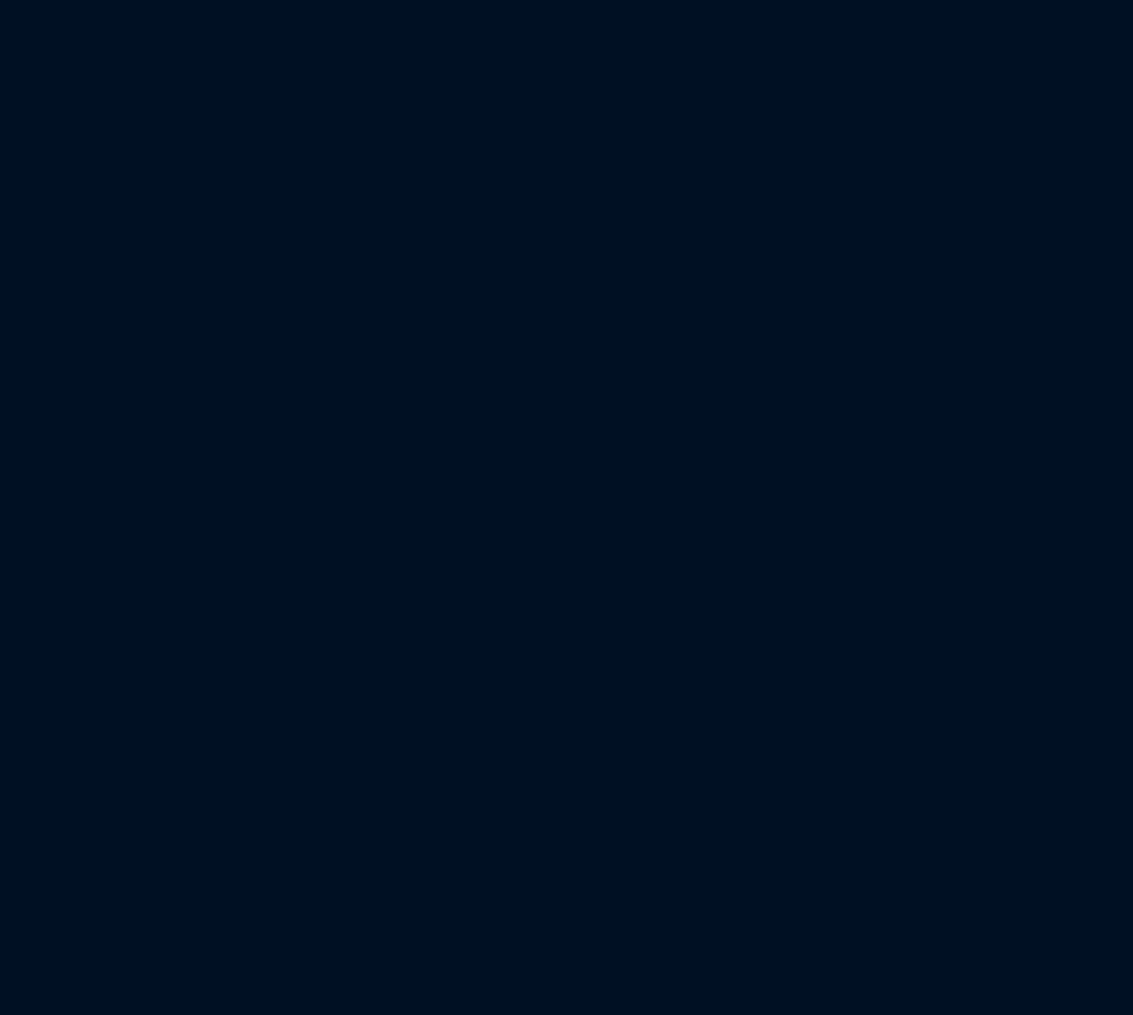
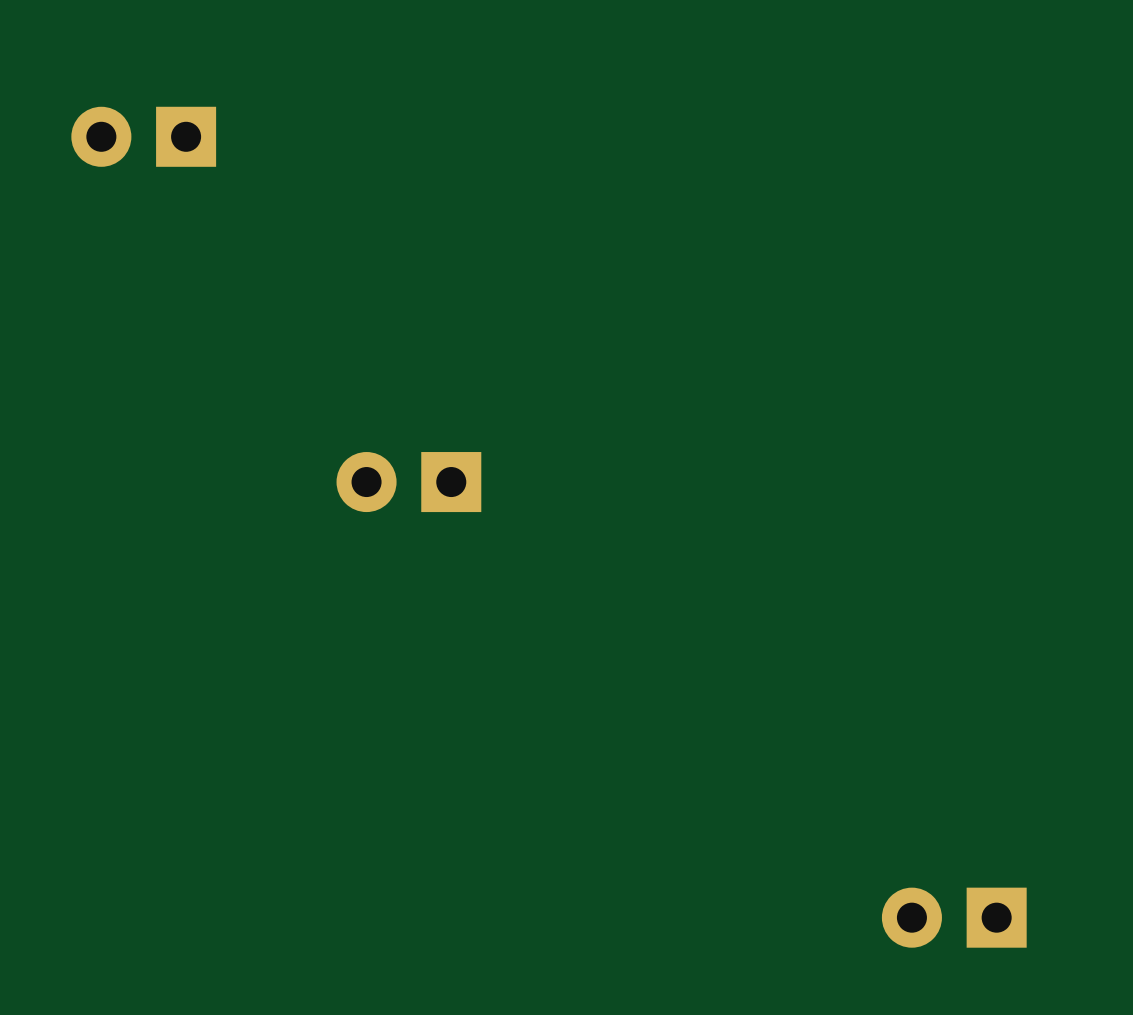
part: none -> (143, 136)
part: none -> (408, 482)
part: none -> (954, 917)

